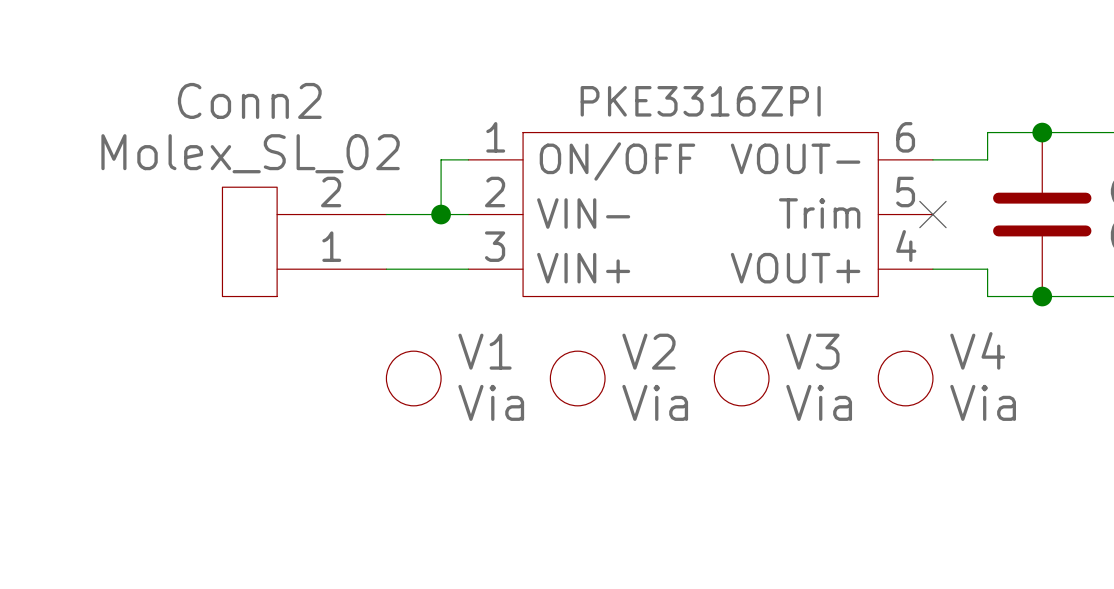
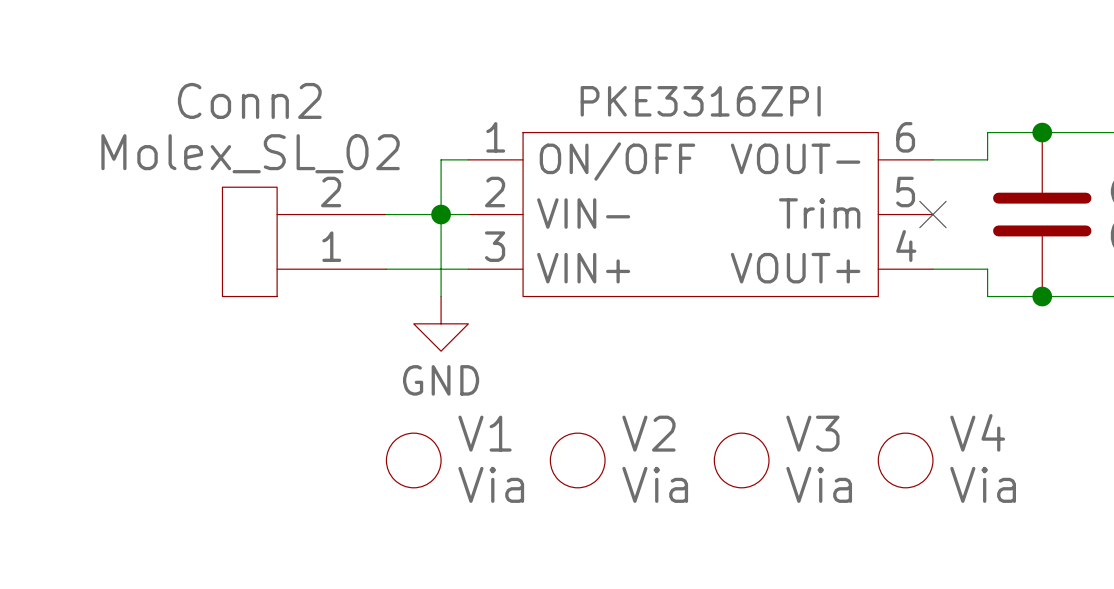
wire: none -> (441, 214) (441, 296)
power symbol: none -> GND (441, 323)
V1 position: (413, 378) -> (413, 460)
V2 position: (577, 378) -> (577, 460)
V3 position: (741, 378) -> (741, 460)
V4 position: (905, 378) -> (905, 460)

